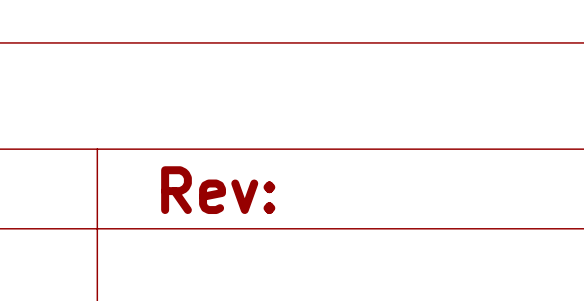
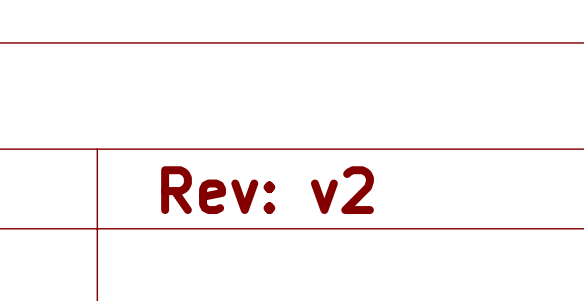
title block: Rev: (218, 190) -> Rev: v2 (267, 190)

